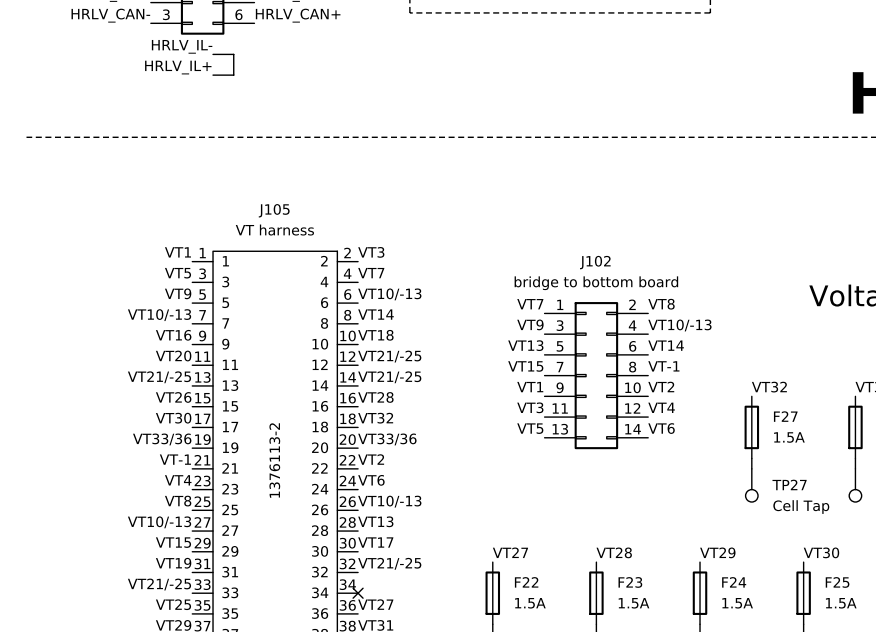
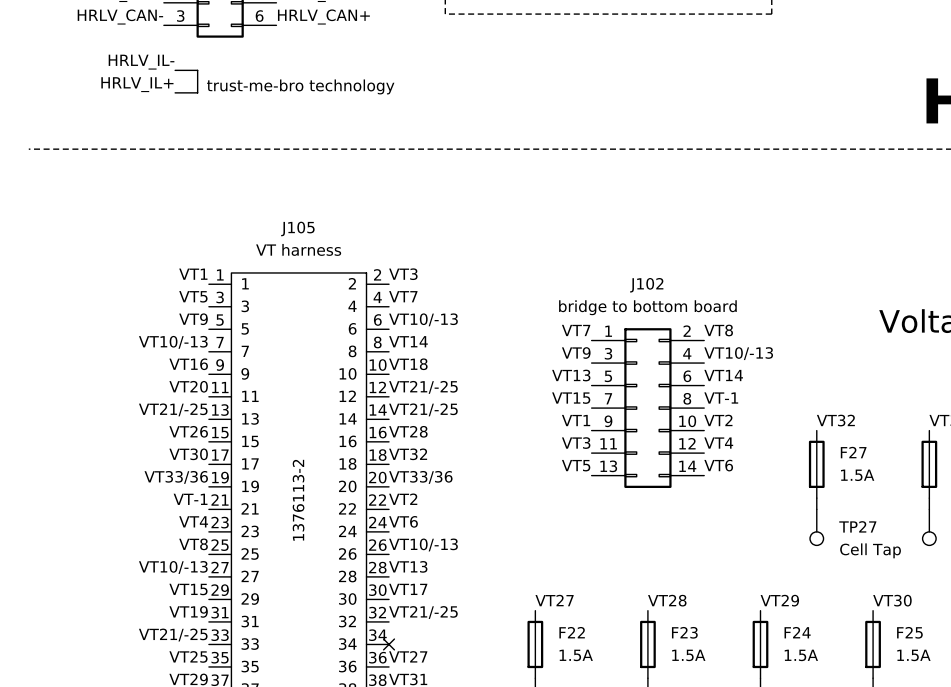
label position: HRLV_IL- (182, 46) -> HRLV_IL- (141, 62)
wire: (213, 54) (233, 54) (233, 75) (213, 75) -> (175, 70) (197, 70) (197, 92) (175, 92)
label position: HRLV_IL+ (178, 67) -> HRLV_IL+ (137, 84)
text: none -> trust-me-bro technology (300, 86)

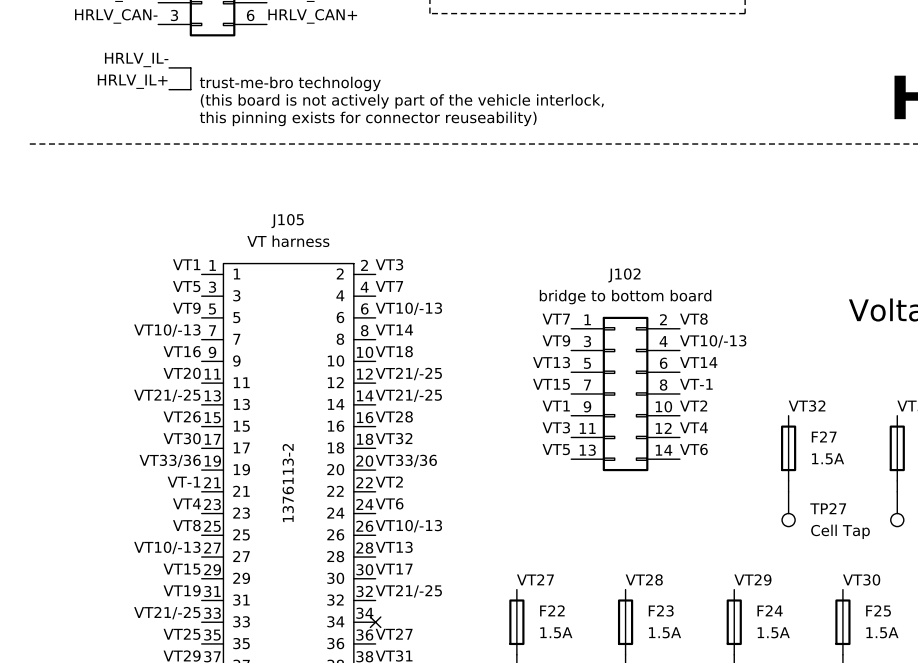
text: none -> (this board is not actively part of the vehicle interlock, (402, 101)
text: none -> this pinning exists for connector reuseability) (368, 118)

